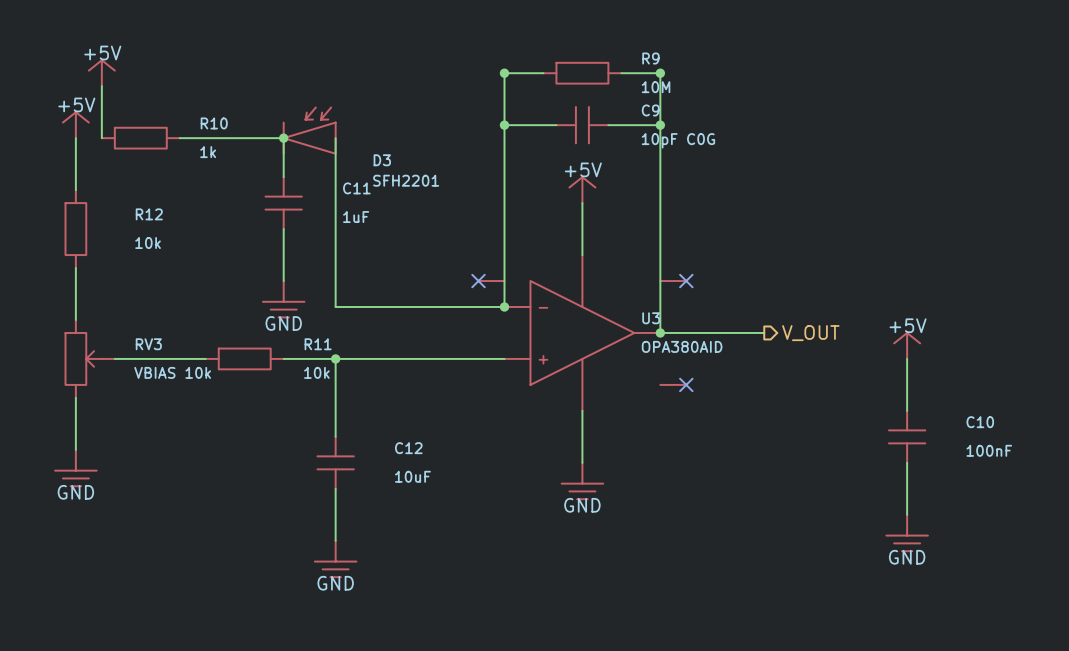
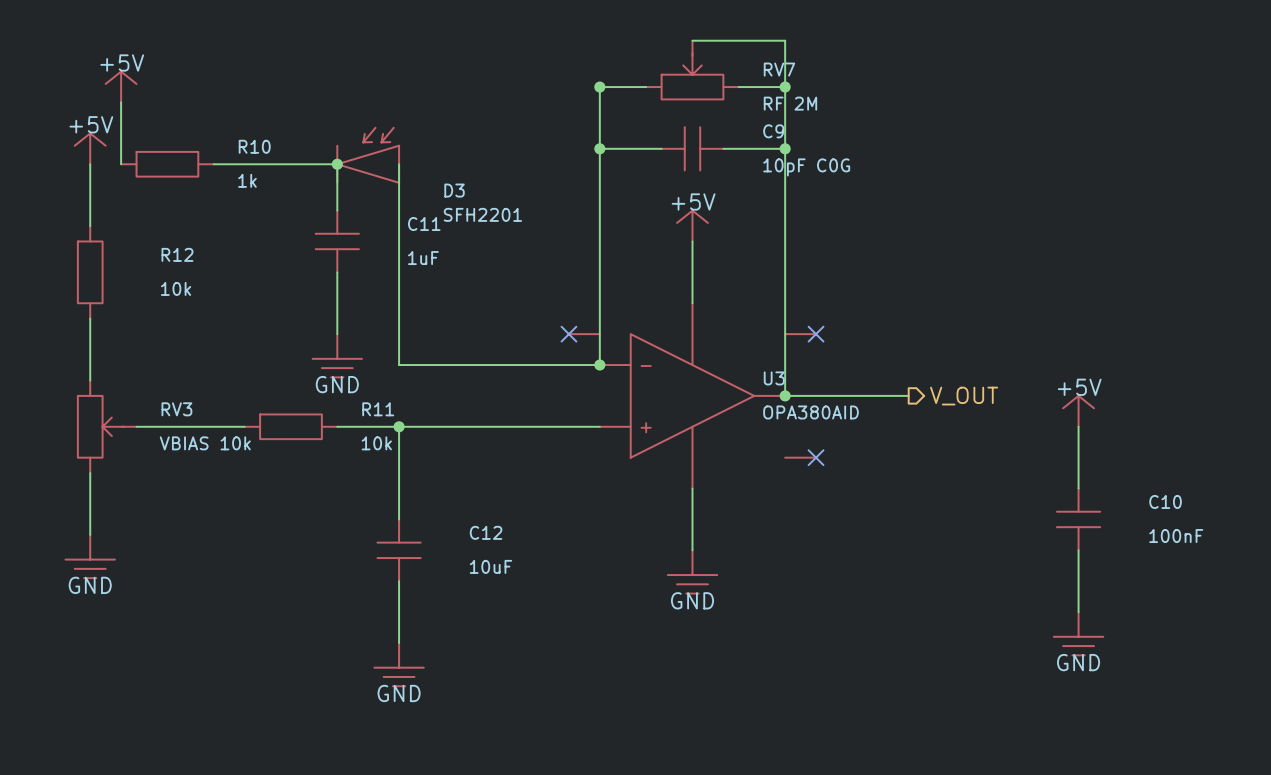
wire: none -> (692, 40) (785, 40) (785, 87)
RV7: none -> RF 2M (692, 70)
R9: 10M (582, 73) -> none

